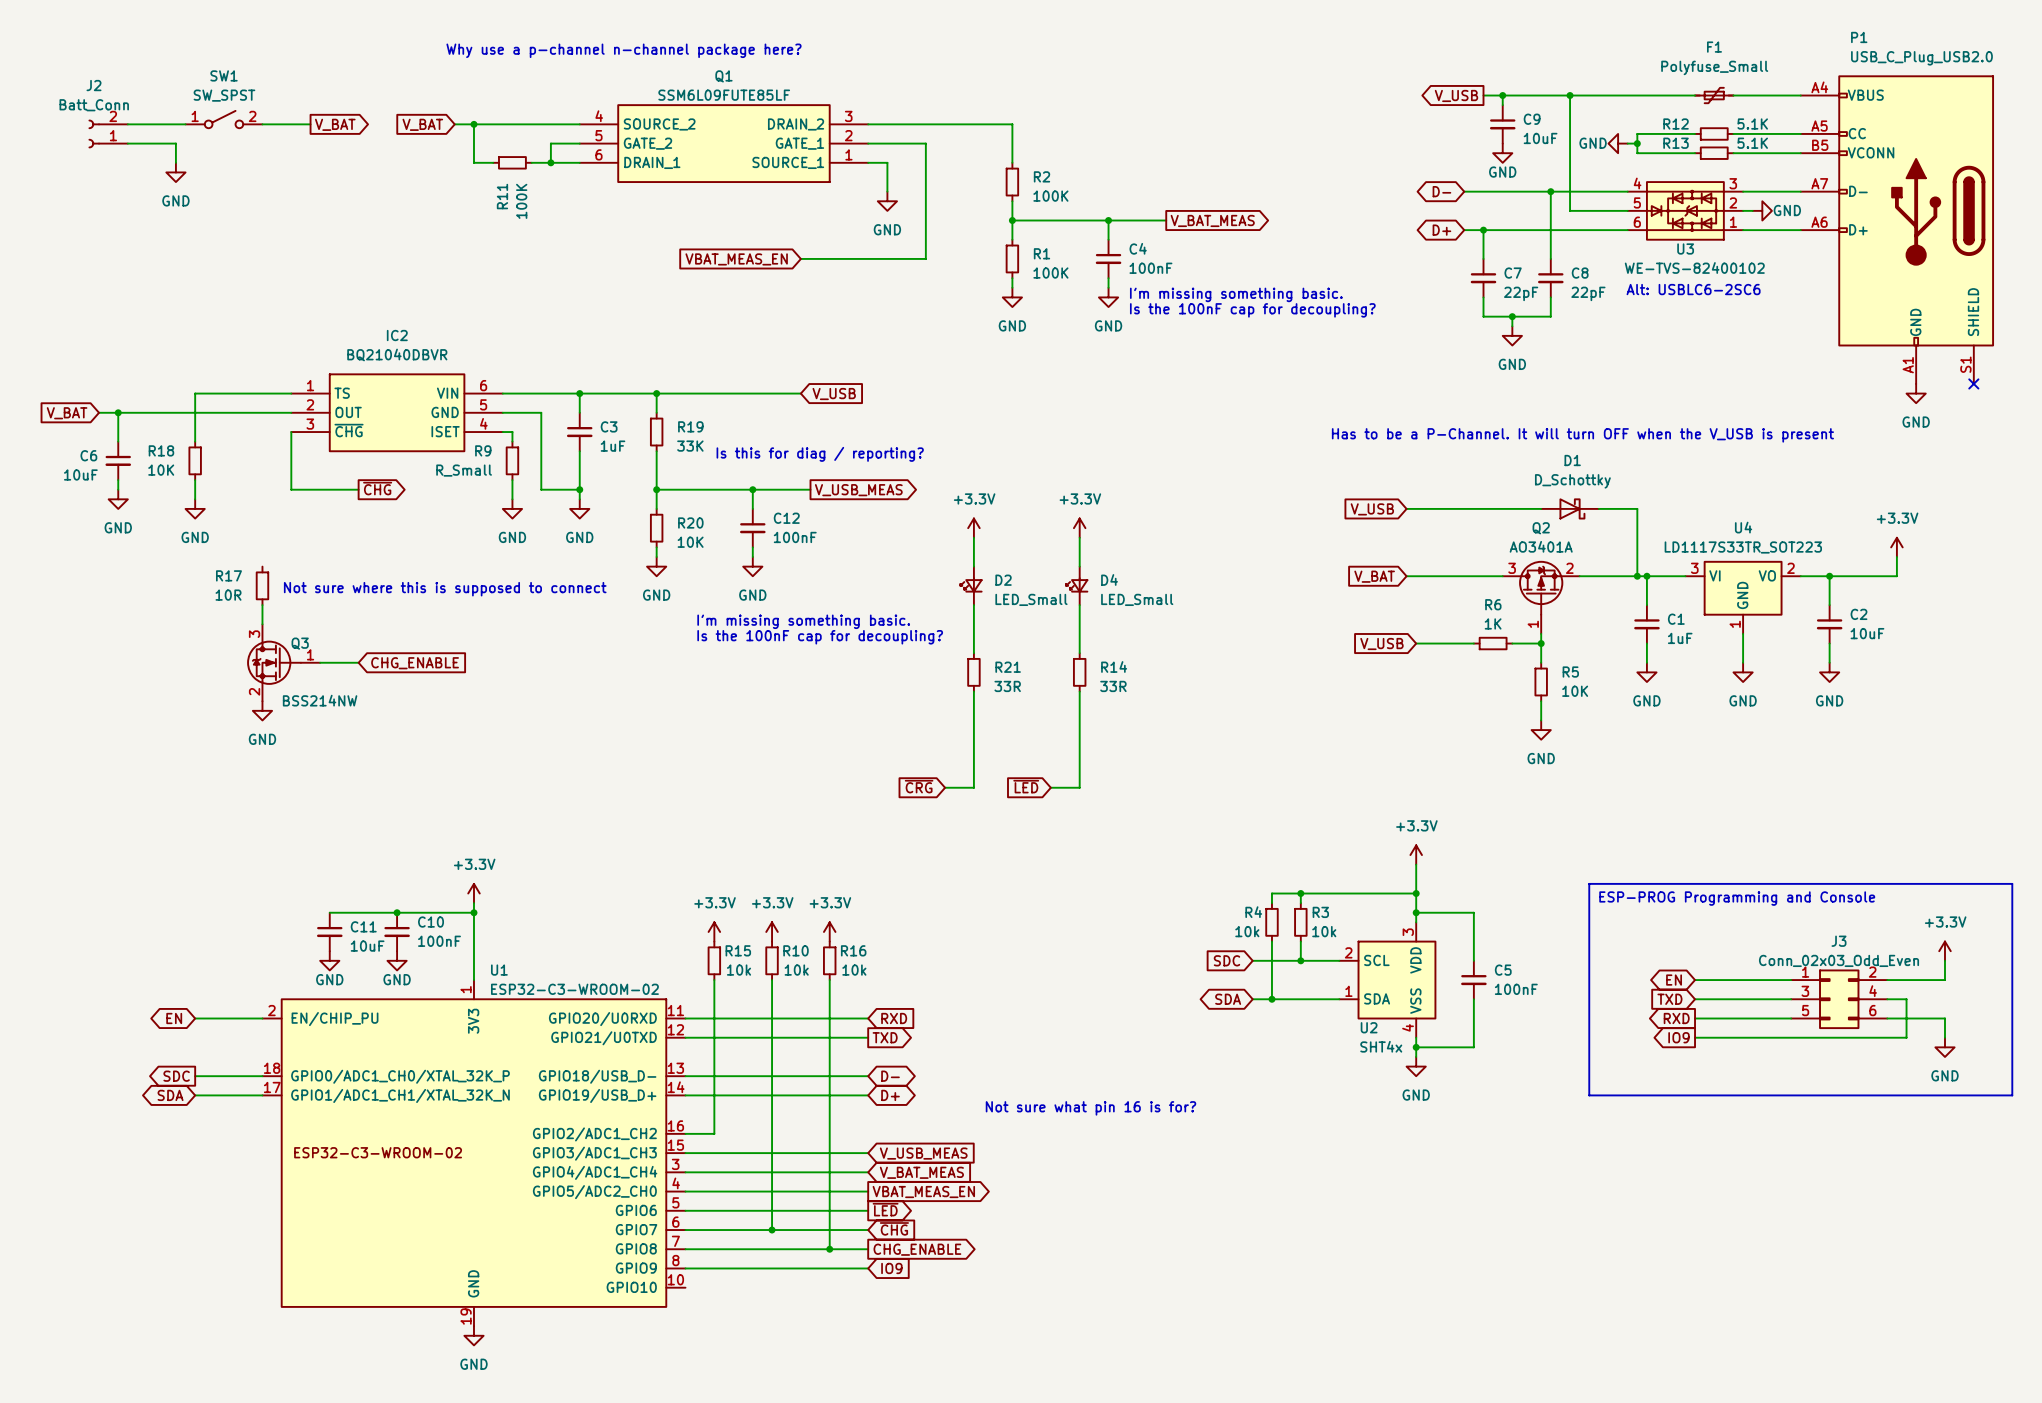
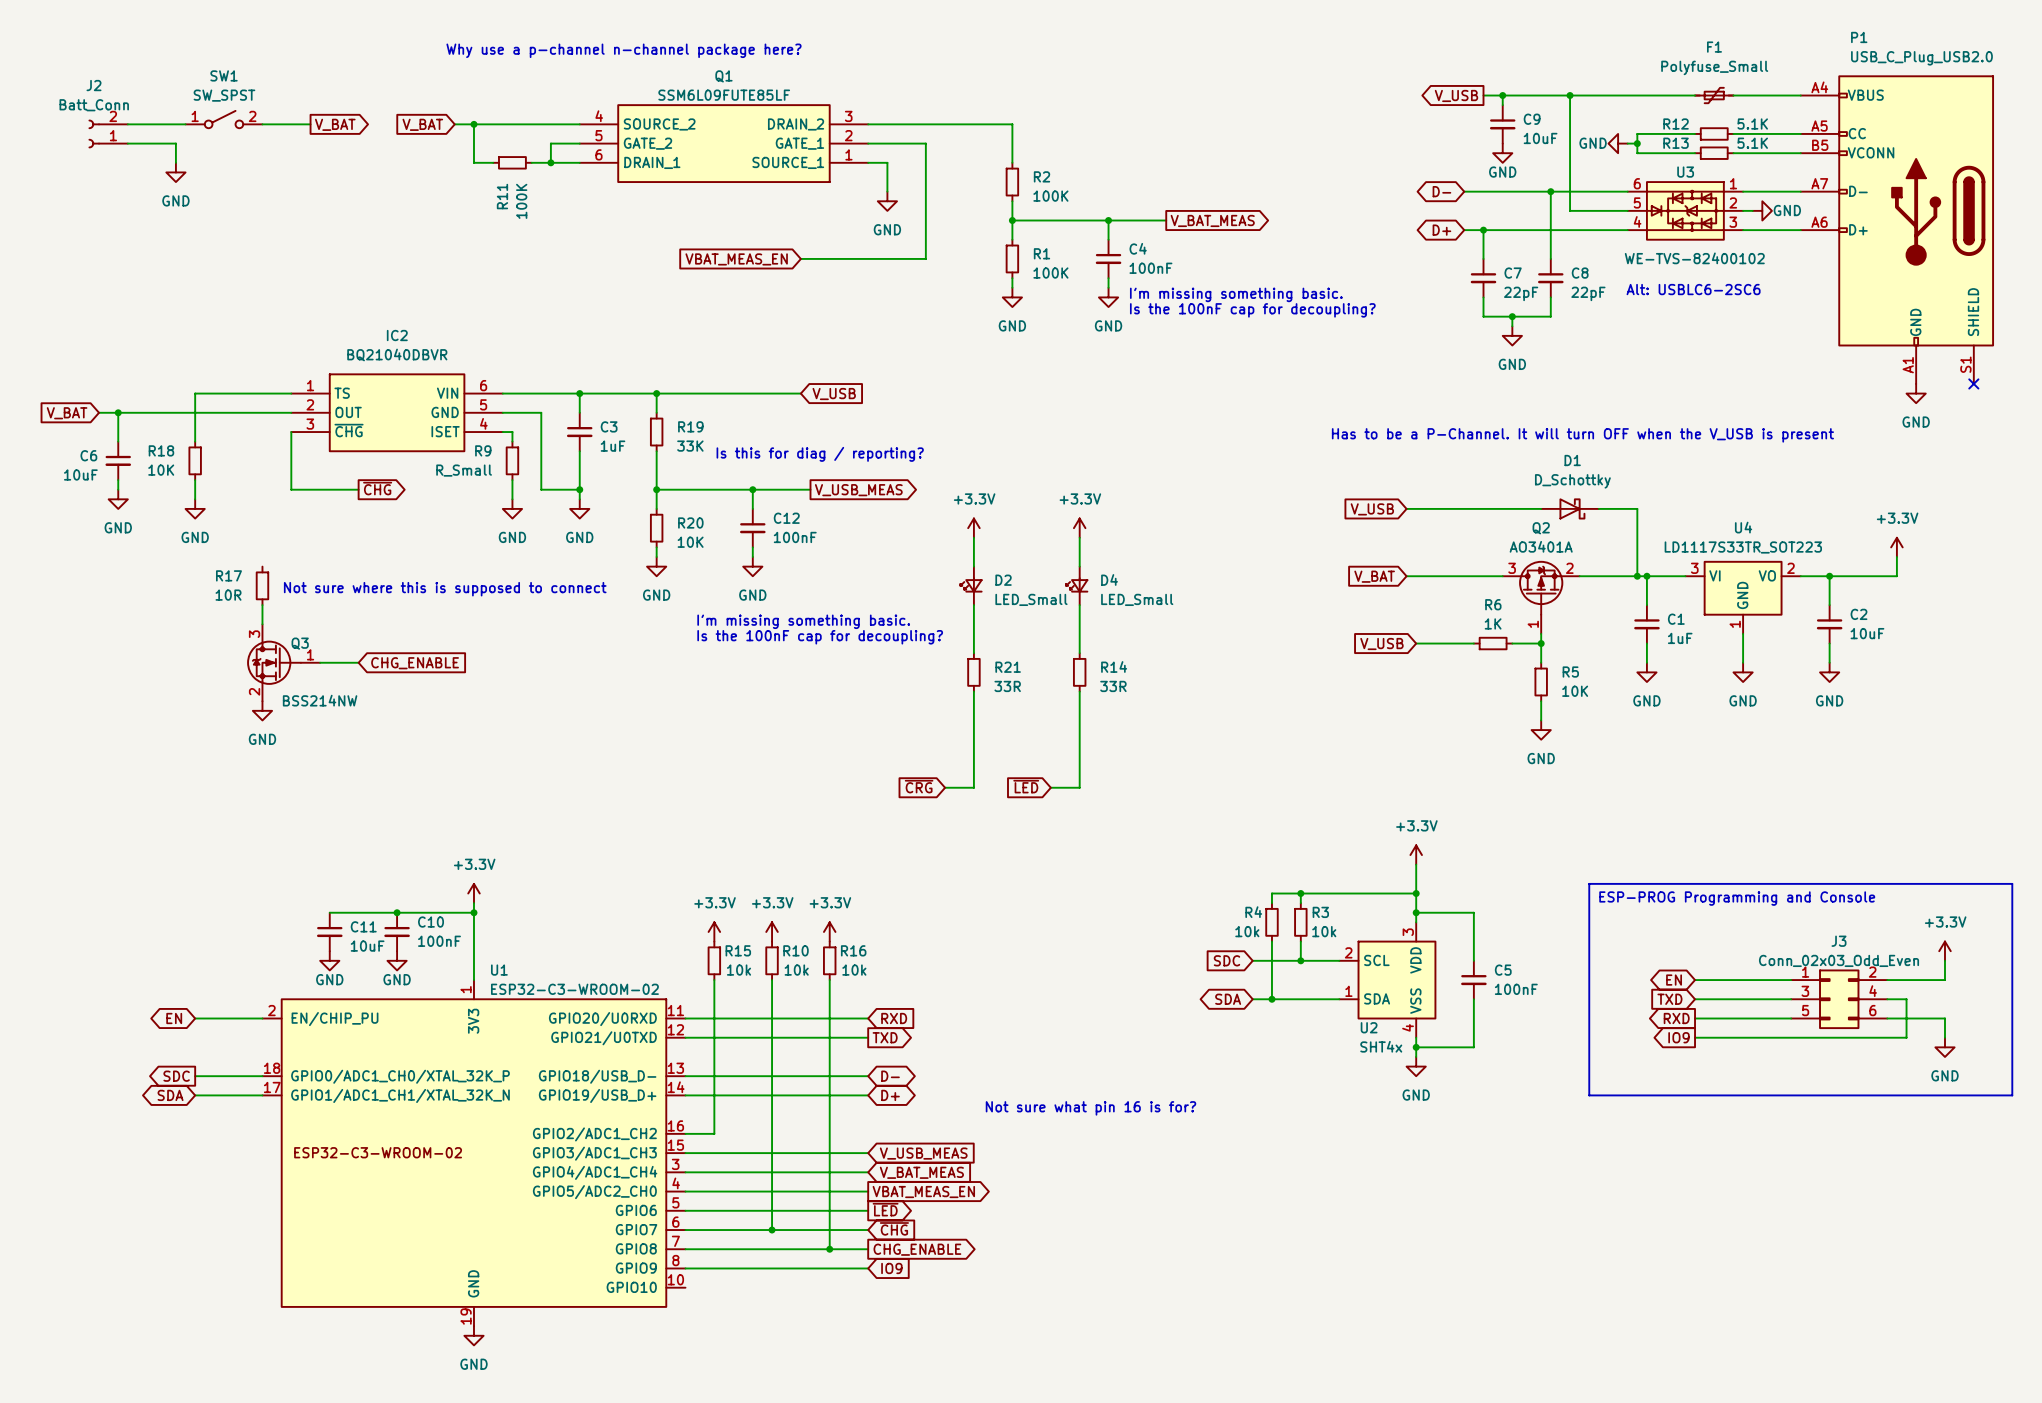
U3 flip: as is (1685, 210) -> up-down (1685, 210)

